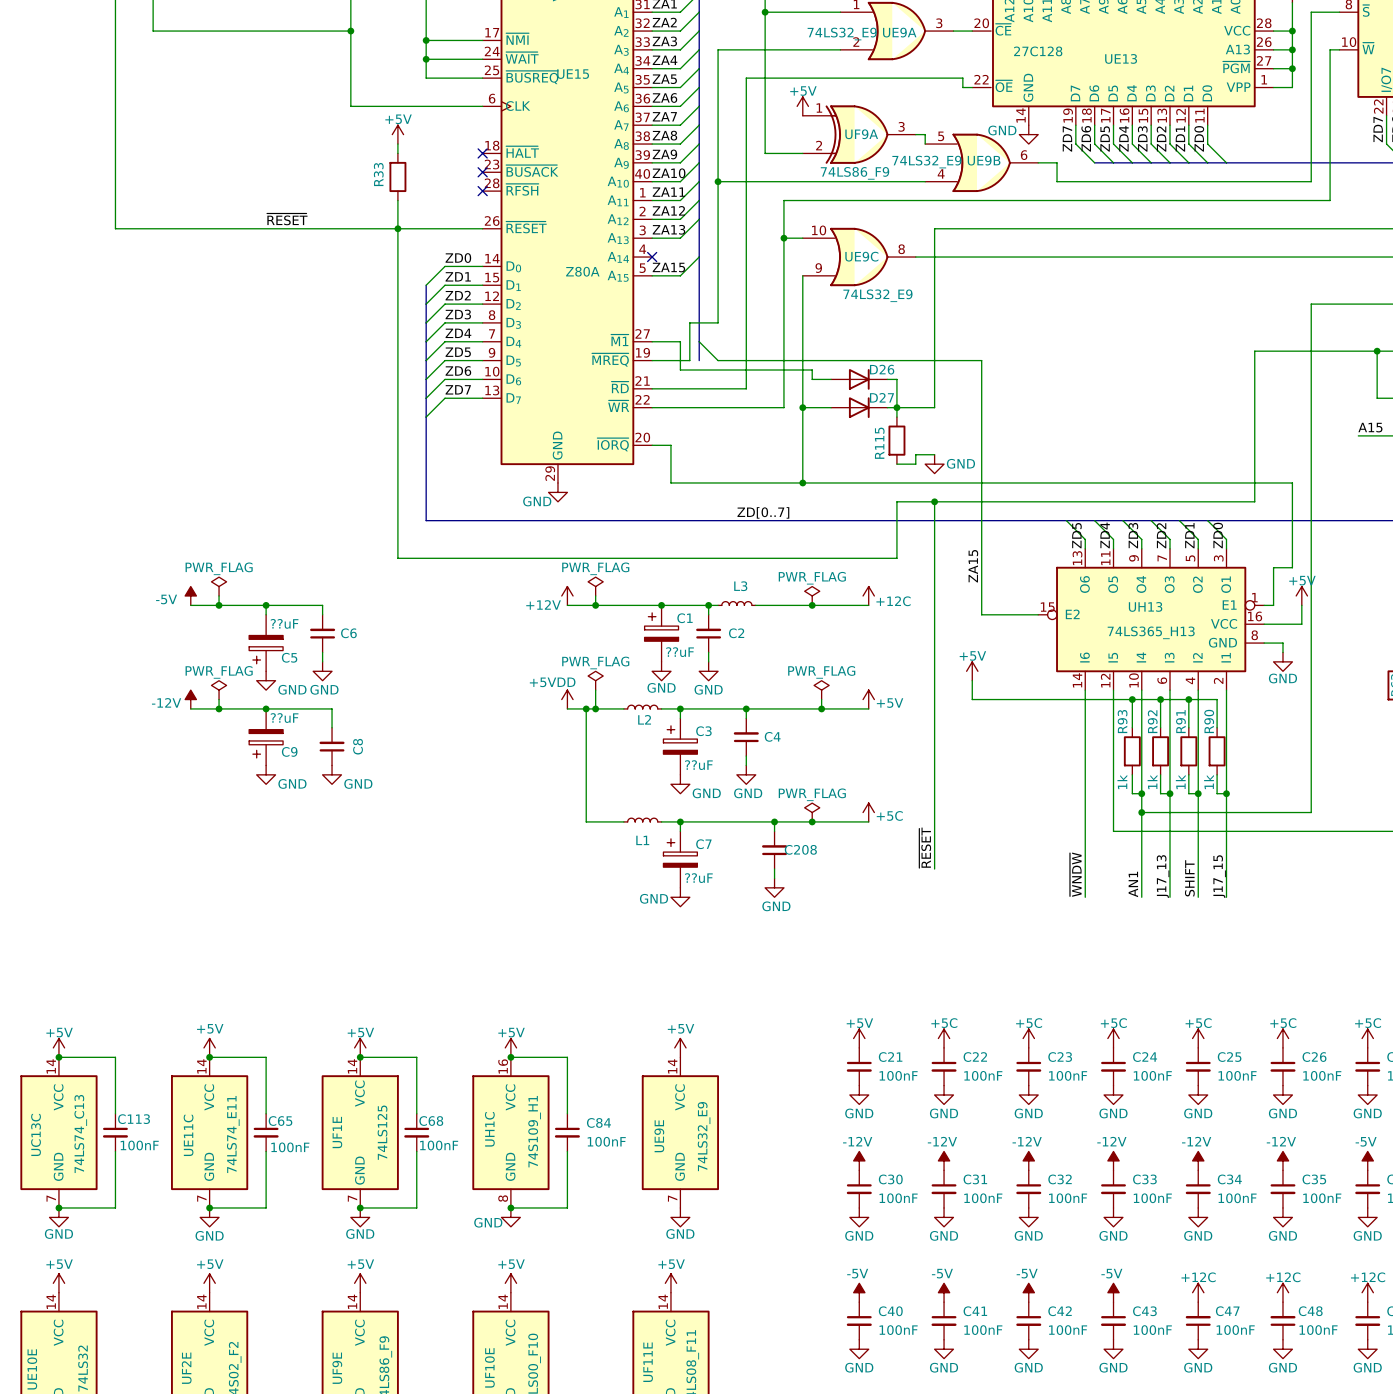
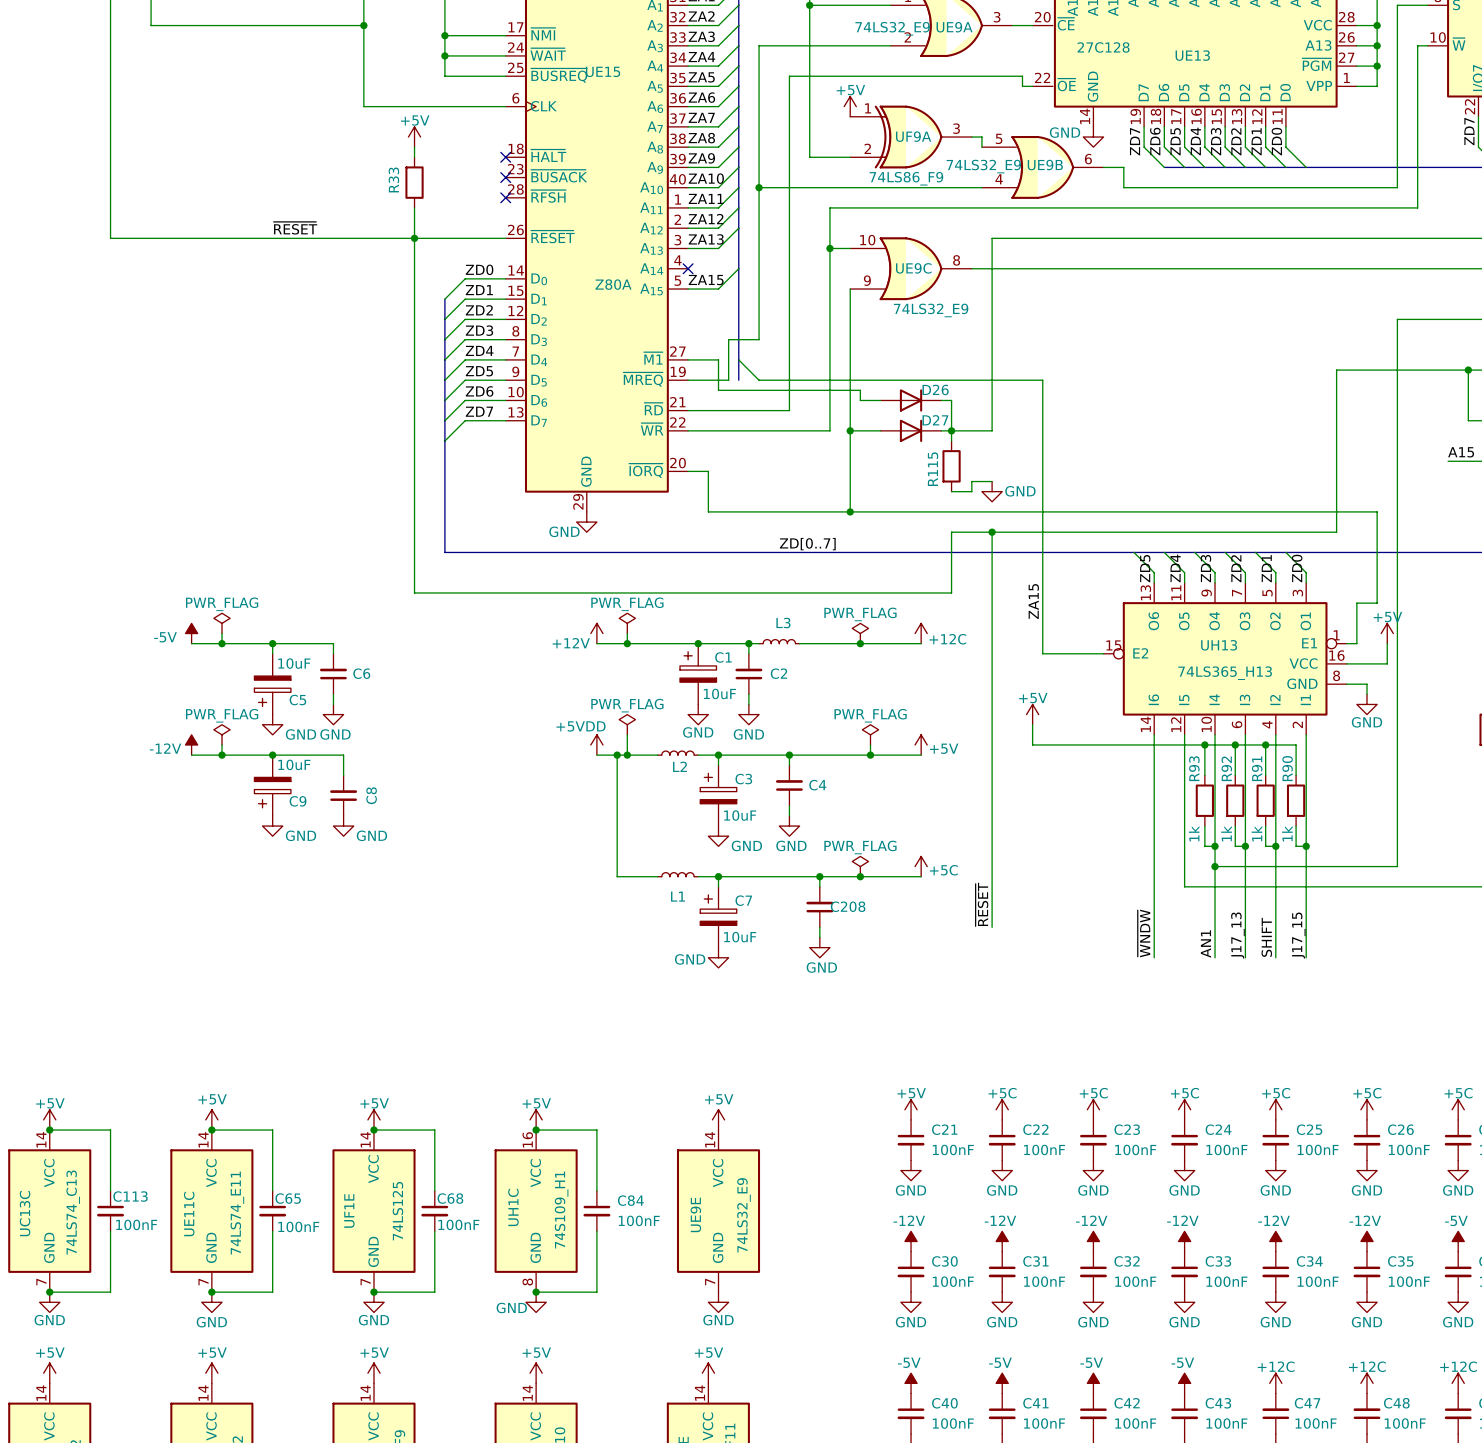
C5 value: ??uF (284, 623) -> 10uF (294, 663)
C1 value: ??uF (680, 652) -> 10uF (719, 693)
C9 value: ??uF (284, 718) -> 10uF (294, 764)
C3 value: ??uF (698, 765) -> 10uF (740, 815)
C7 value: ??uF (698, 878) -> 10uF (740, 937)

